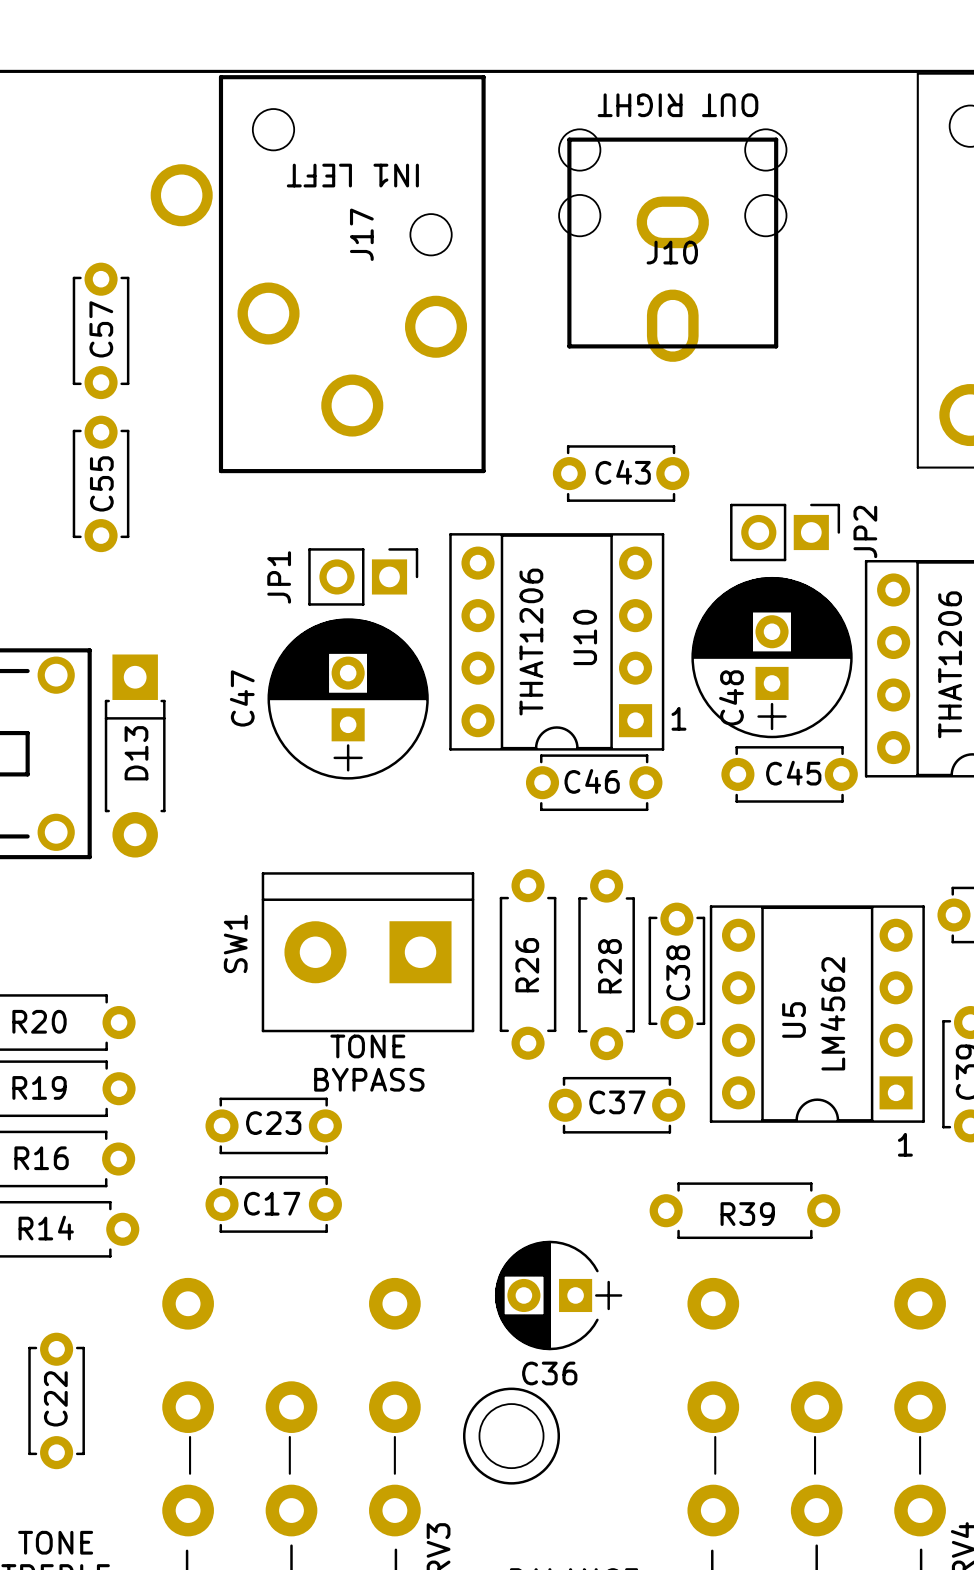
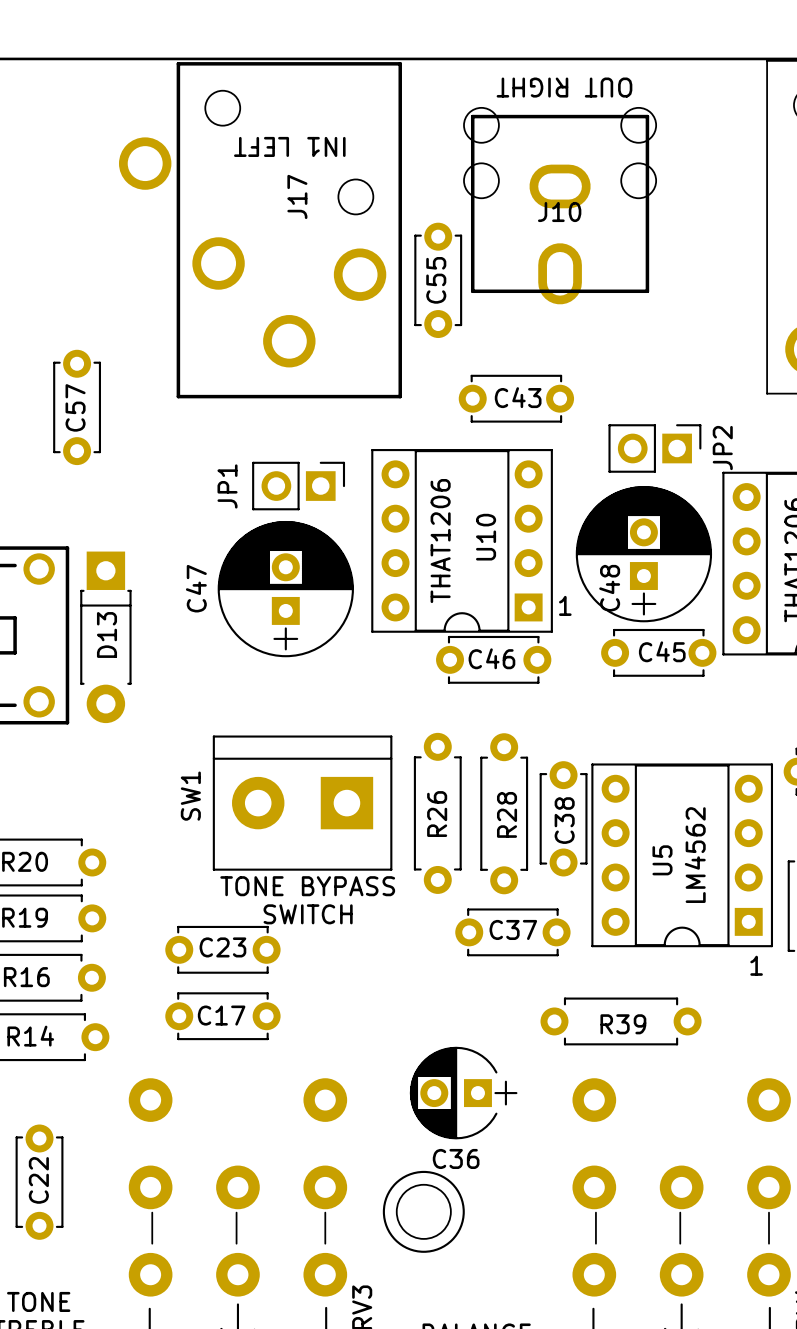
C57: (101, 330) -> none
C55: none -> (438, 280)
C55 name: C55 (101, 483) -> C57 (75, 407)
text: TONE (367, 1046) -> TONE BYPASS (307, 886)
text: BYPASS (369, 1079) -> SWITCH (308, 914)

